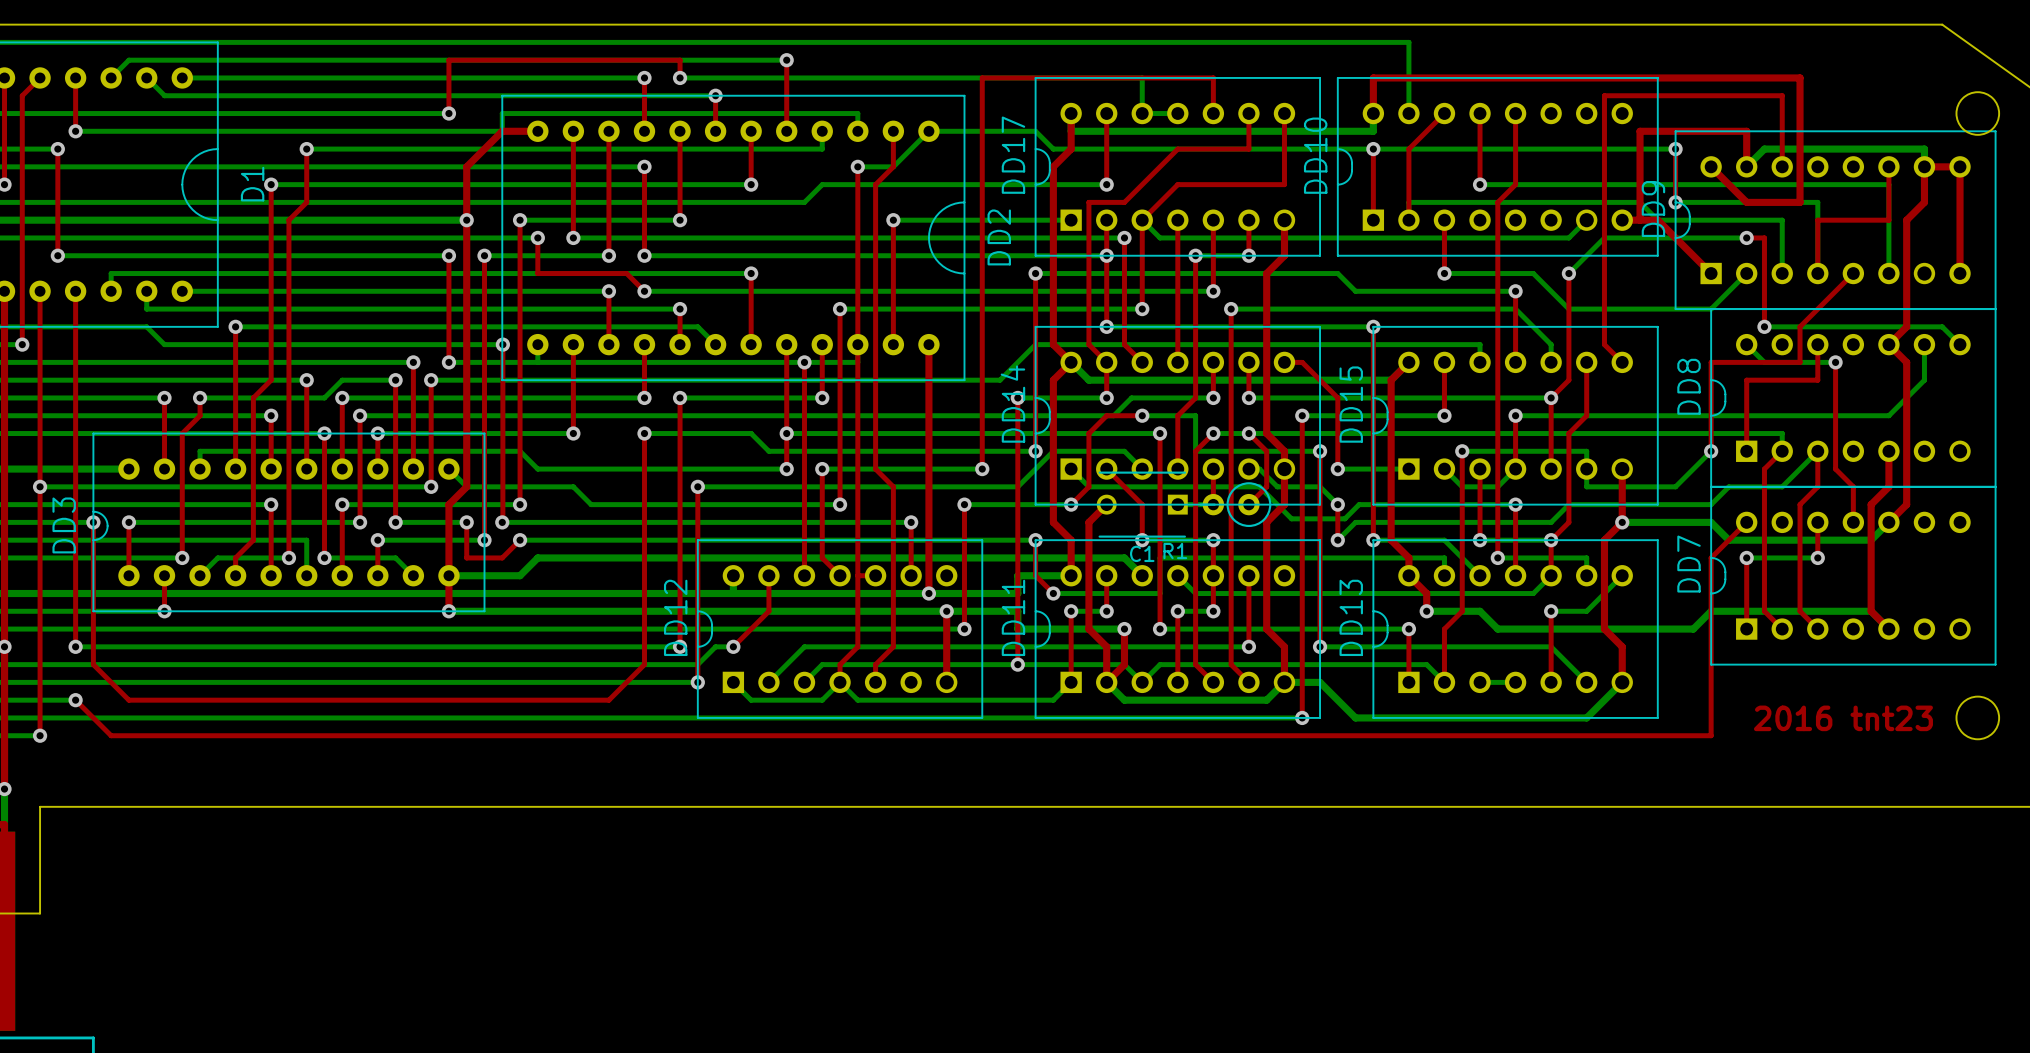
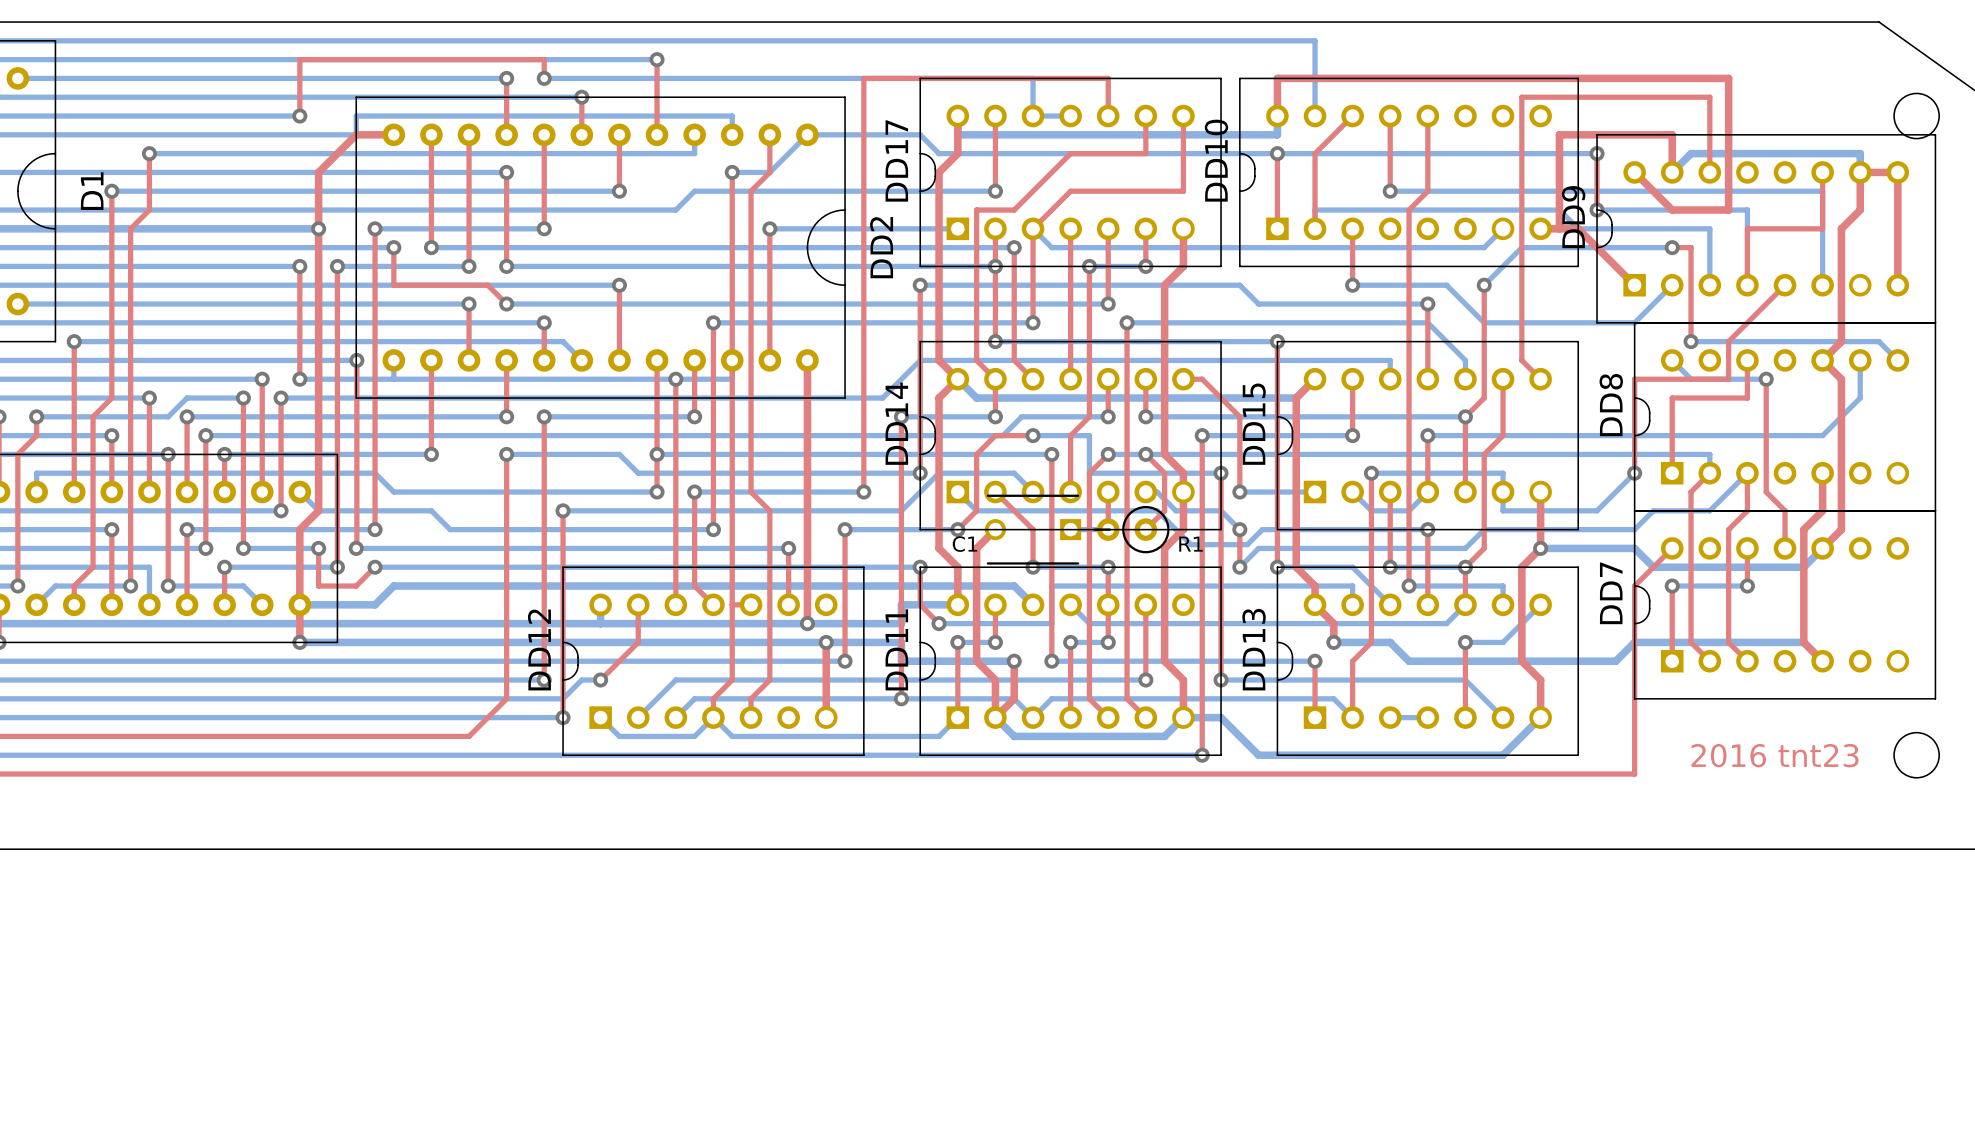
R1 name position: R1 (1175, 551) -> R1 (1191, 544)
C1 name position: C1 (1142, 553) -> C1 (964, 544)

